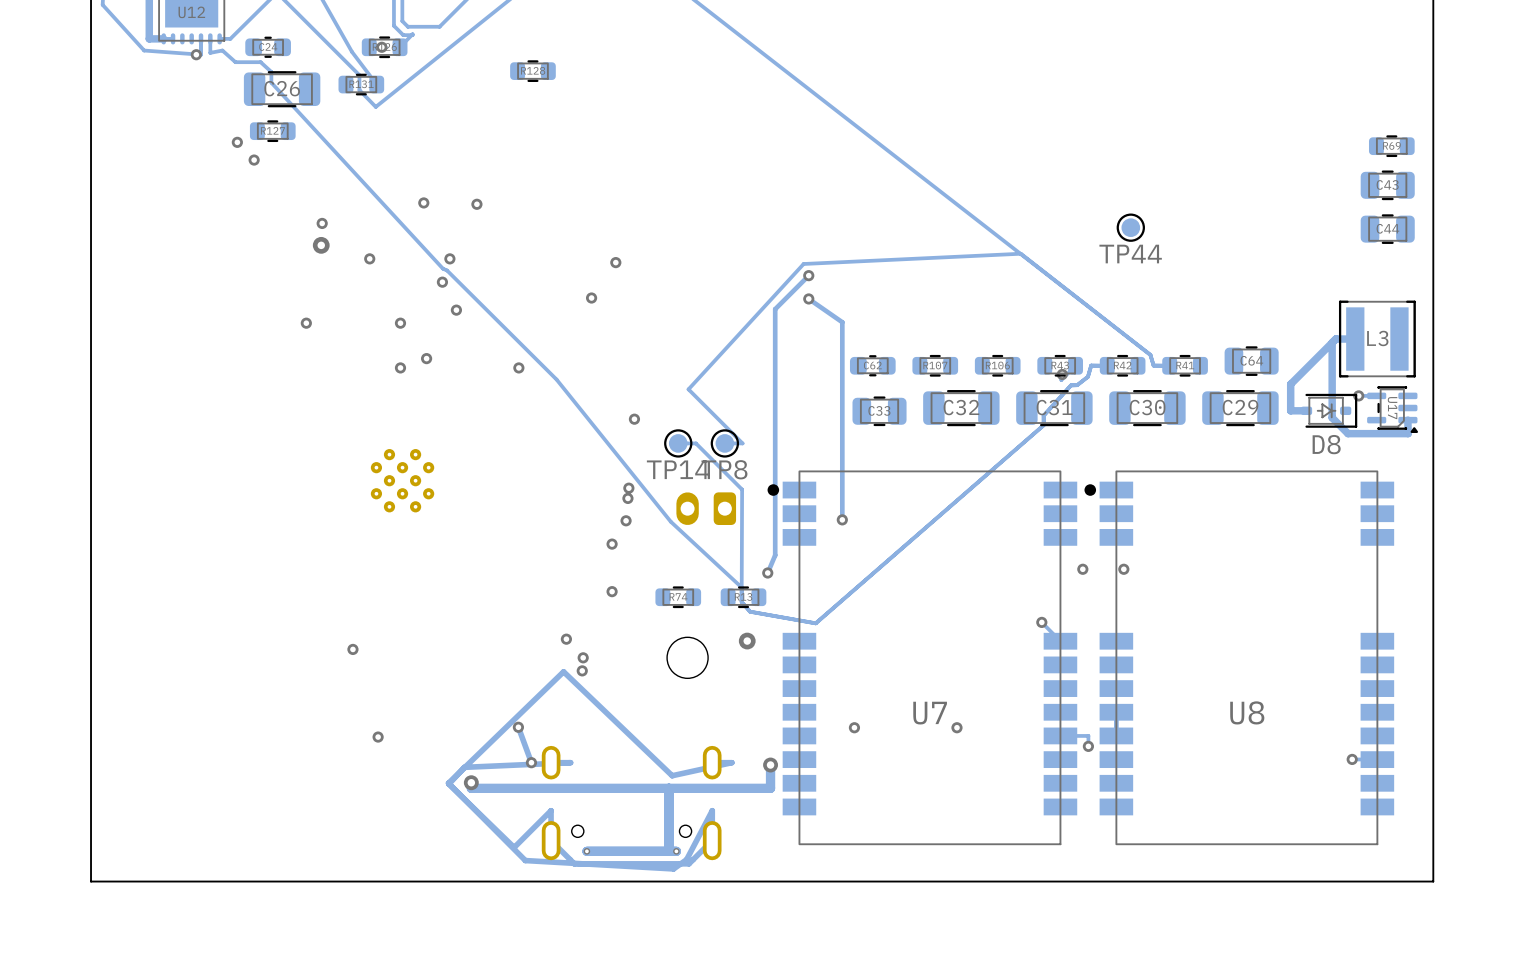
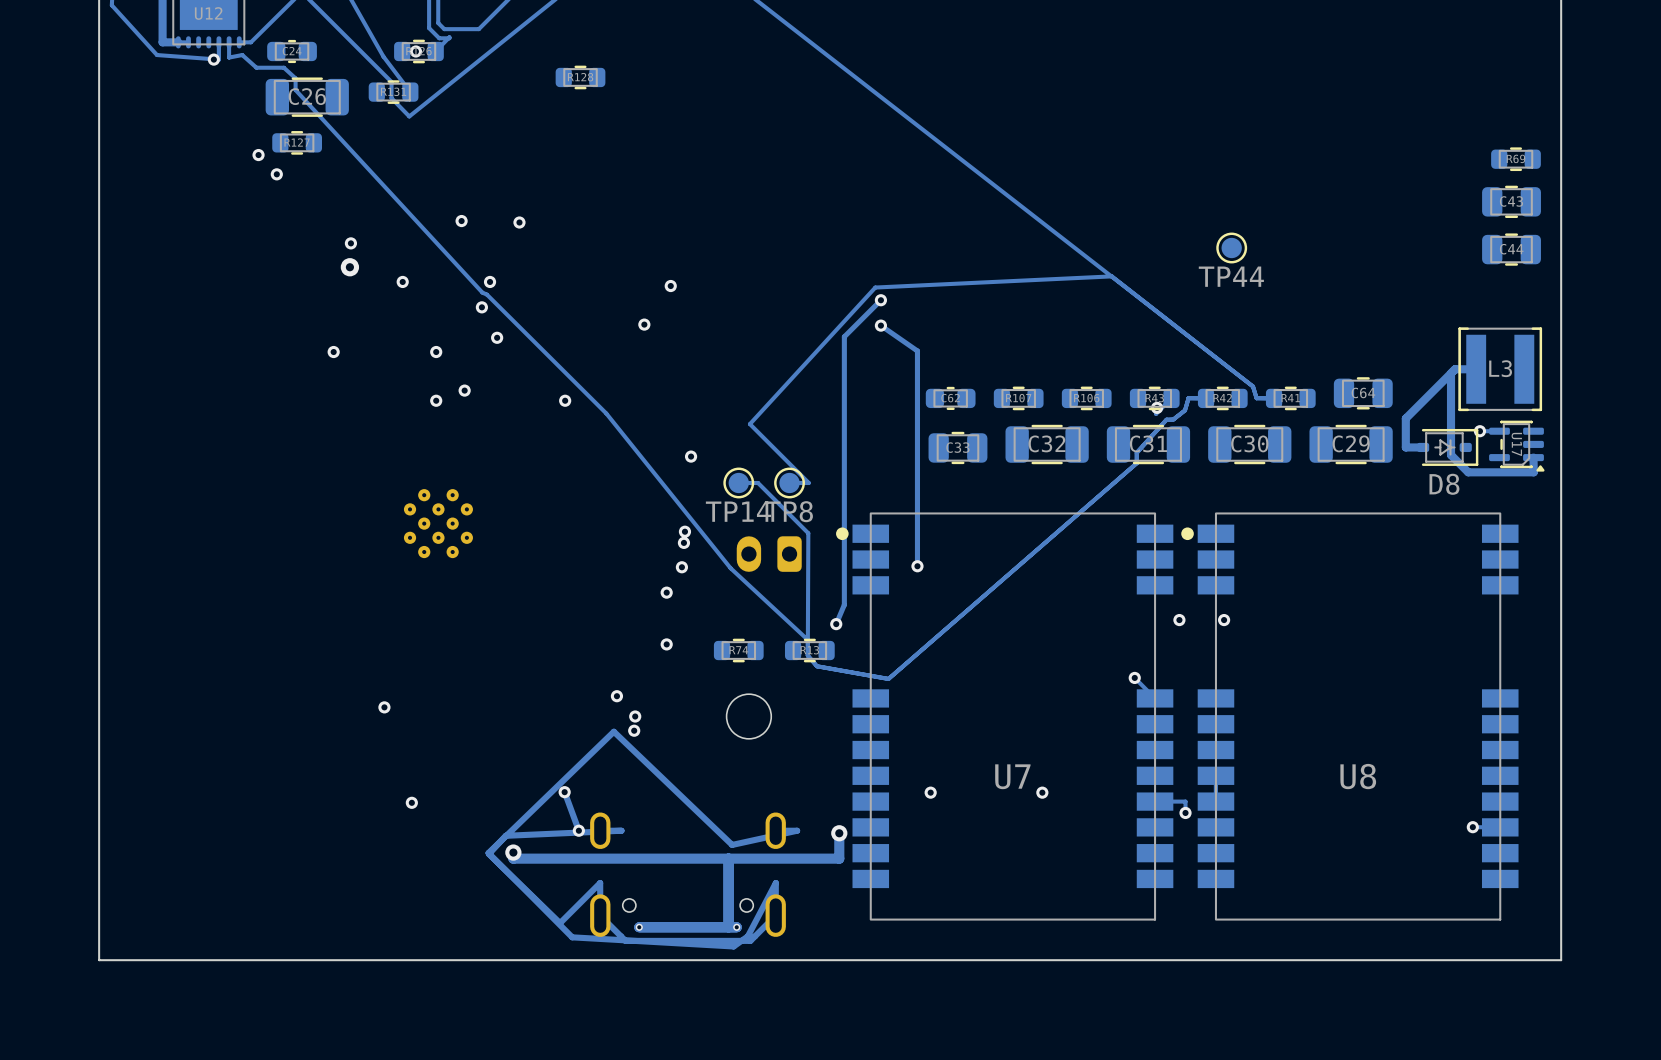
via: (747, 641) -> none

